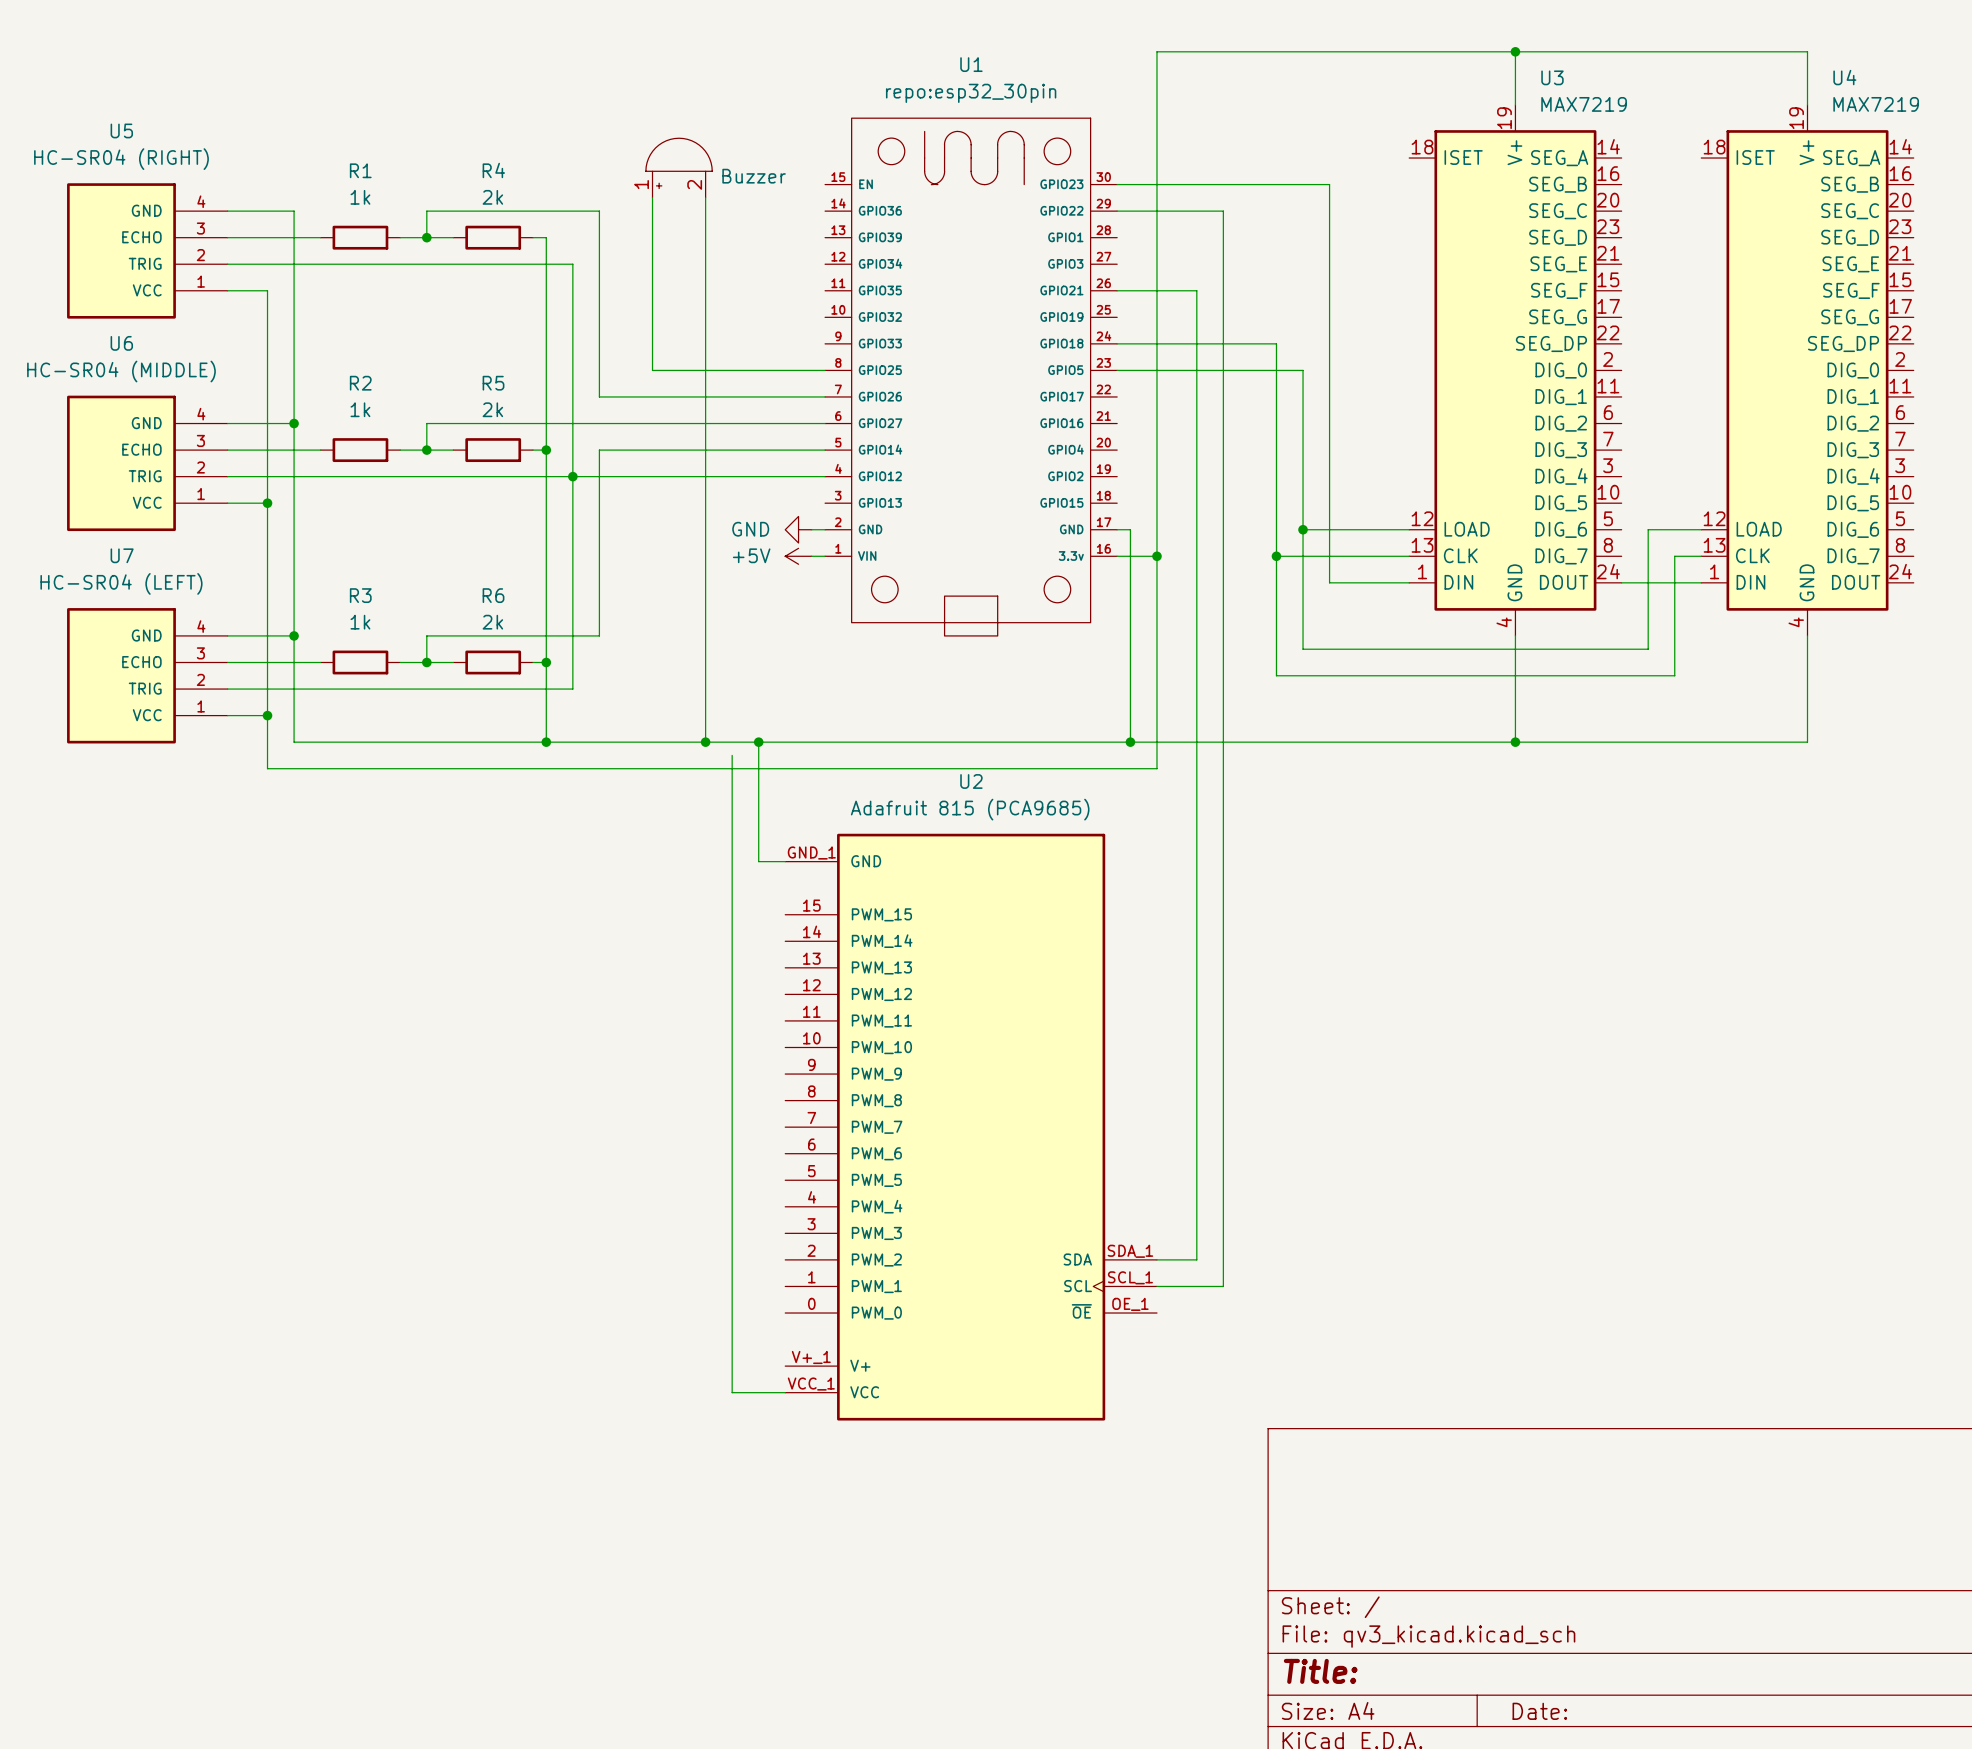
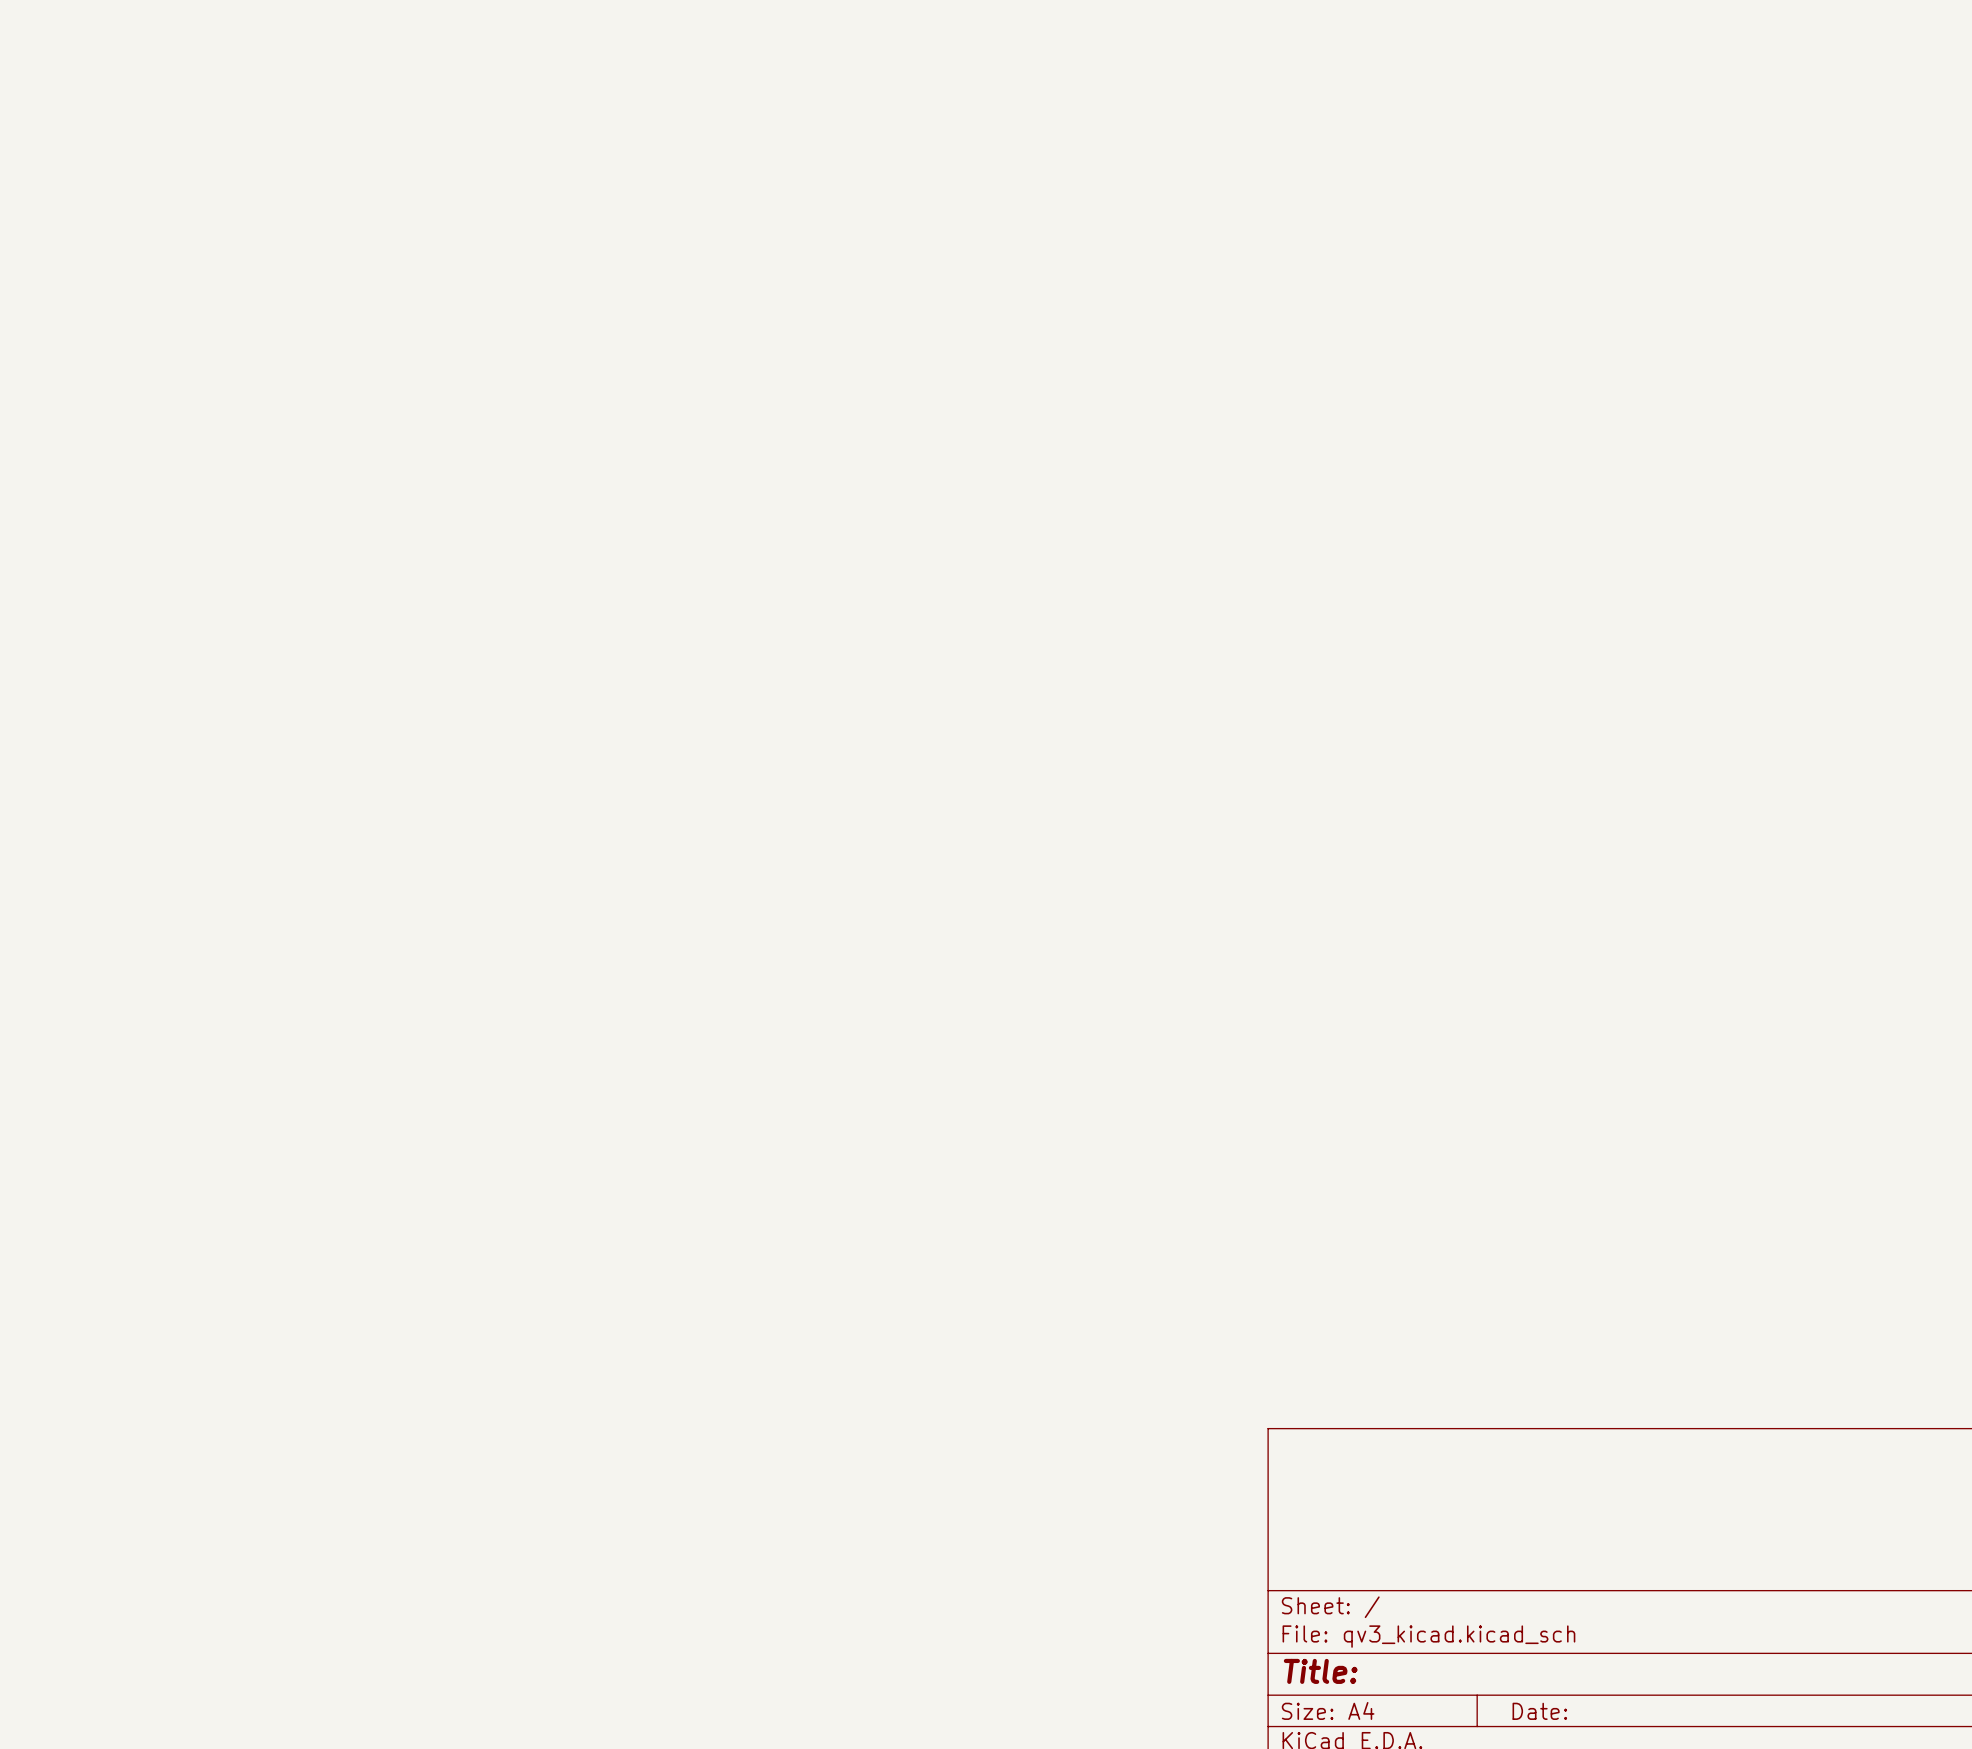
wire: (1515, 51) (1515, 104) -> none
junction: (1515, 51) -> none
wire: (1807, 104) (1807, 51) (1156, 51) (1156, 768) (267, 768) (267, 290) (227, 290) -> none
part: Buzzer (679, 168) -> none
wire: (1117, 184) (1329, 184) (1329, 582) (1409, 582) -> none
wire: (652, 197) (652, 370) (825, 370) -> none
wire: (705, 197) (705, 742) -> none
wire: (227, 211) (294, 211) (294, 742) (1807, 742) (1807, 635) -> none
wire: (1117, 211) (1223, 211) (1223, 1286) (1156, 1286) -> none
wire: (227, 237) (320, 237) -> none
R1: 1k (360, 237) -> none
wire: (400, 237) (453, 237) -> none
wire: (426, 237) (426, 211) (599, 211) (599, 396) (825, 396) -> none
junction: (426, 237) -> none
R4: 2k (493, 237) -> none
wire: (533, 237) (546, 237) (546, 742) -> none
U5: HC-SR04 (RIGHT) (147, 250) -> none
wire: (227, 264) (572, 264) (572, 689) (227, 689) -> none
wire: (1117, 290) (1196, 290) (1196, 1259) (1156, 1259) -> none
wire: (1117, 343) (1276, 343) (1276, 675) (1674, 675) (1674, 556) (1701, 556) -> none
wire: (1117, 370) (1303, 370) (1303, 649) (1648, 649) (1648, 529) (1701, 529) -> none
U3: MAX7219 (1515, 370) -> none
U4: MAX7219 (1807, 370) -> none
U1: (971, 377) -> none
wire: (227, 423) (294, 423) -> none
junction: (294, 423) -> none
wire: (825, 423) (426, 423) (426, 450) -> none
wire: (227, 450) (320, 450) -> none
R2: 1k (360, 450) -> none
wire: (400, 450) (453, 450) -> none
junction: (426, 450) -> none
R5: 2k (493, 450) -> none
wire: (533, 450) (546, 450) -> none
junction: (546, 450) -> none
wire: (825, 450) (599, 450) (599, 635) (426, 635) (426, 662) -> none
U6: HC-SR04 (MIDDLE) (147, 463) -> none
wire: (227, 476) (825, 476) -> none
junction: (572, 476) -> none
wire: (227, 503) (267, 503) -> none
junction: (267, 503) -> none
power symbol: GND (798, 529) -> none
wire: (811, 529) (825, 529) -> none
wire: (1117, 529) (1130, 529) (1130, 742) -> none
wire: (1303, 529) (1409, 529) -> none
junction: (1303, 529) -> none
power symbol: +5V (798, 556) -> none
wire: (811, 556) (825, 556) -> none
wire: (1117, 556) (1156, 556) -> none
junction: (1156, 556) -> none
wire: (1276, 556) (1409, 556) -> none
junction: (1276, 556) -> none
wire: (1621, 582) (1701, 582) -> none
wire: (227, 635) (294, 635) -> none
junction: (294, 635) -> none
wire: (1515, 635) (1515, 742) -> none
wire: (227, 662) (320, 662) -> none
R3: 1k (360, 662) -> none
wire: (400, 662) (453, 662) -> none
junction: (426, 662) -> none
R6: 2k (493, 662) -> none
wire: (533, 662) (546, 662) -> none
junction: (546, 662) -> none
U7: HC-SR04 (LEFT) (147, 675) -> none
wire: (227, 715) (267, 715) -> none
junction: (267, 715) -> none
junction: (546, 742) -> none
junction: (705, 742) -> none
wire: (758, 742) (758, 861) (785, 861) -> none
junction: (758, 742) -> none
junction: (1130, 742) -> none
junction: (1515, 742) -> none
wire: (732, 755) (732, 1392) (785, 1392) -> none
U2: Adafruit 815 (PCA9685) (971, 1127) -> none

